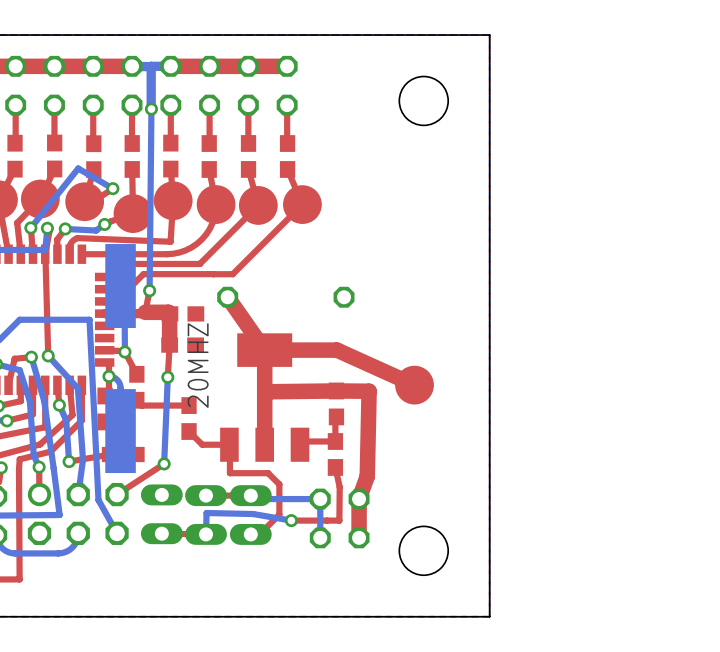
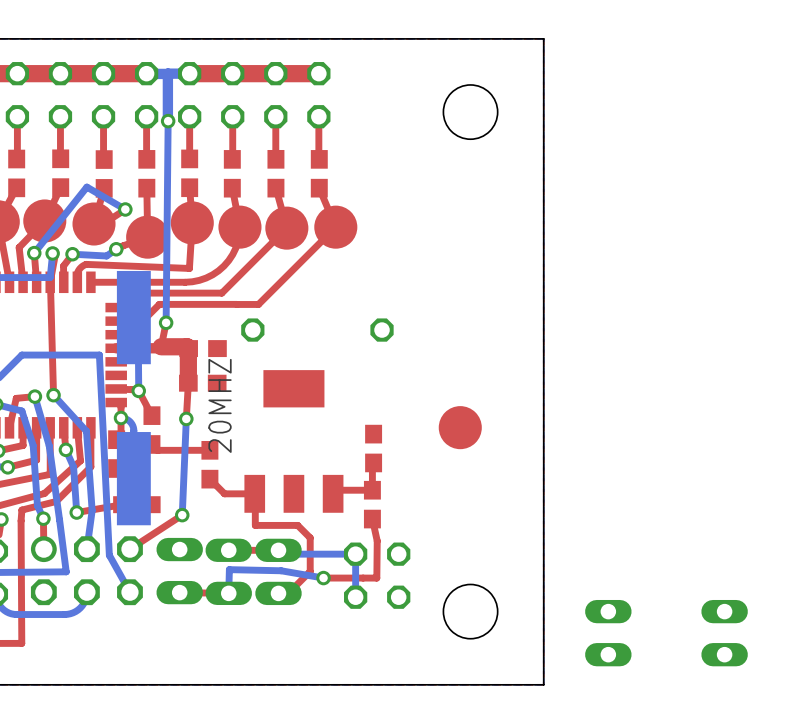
top track: (227, 297) (264, 350) -> none
top track: (264, 350) (264, 444) -> none
top track: (264, 350) (336, 350) (414, 385) -> none
top track: (264, 391) (369, 391) (367, 476) (359, 499) -> none
top track: (359, 499) (359, 537) -> none
part: none -> (608, 633)
part: none -> (724, 633)

